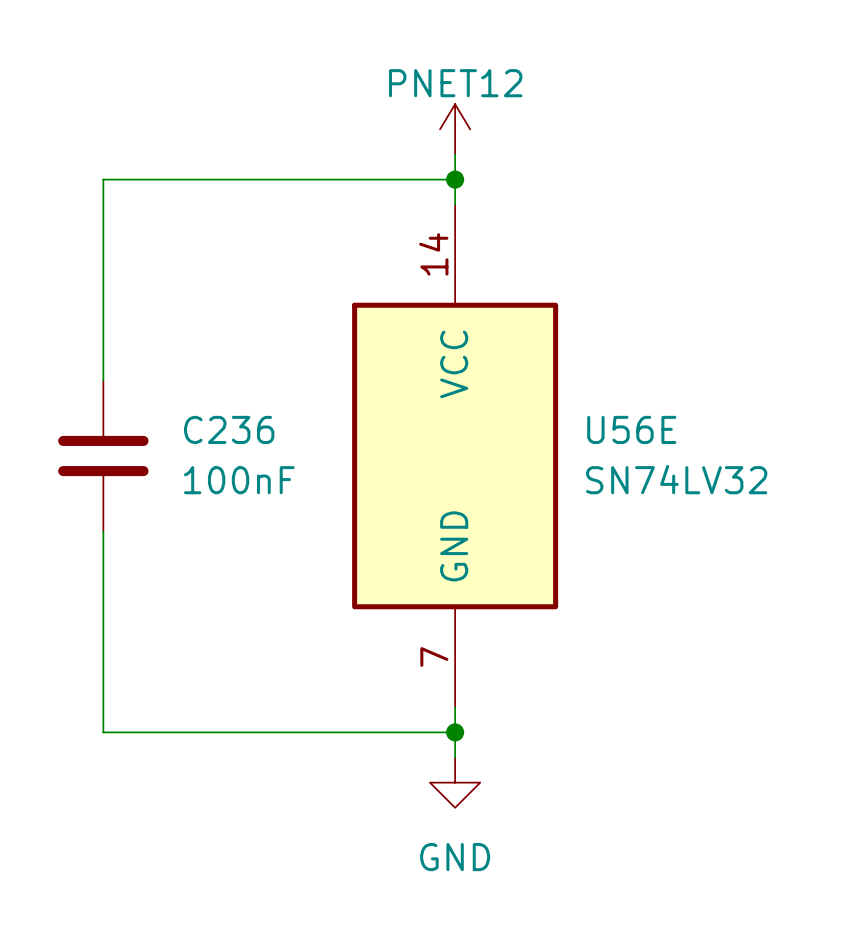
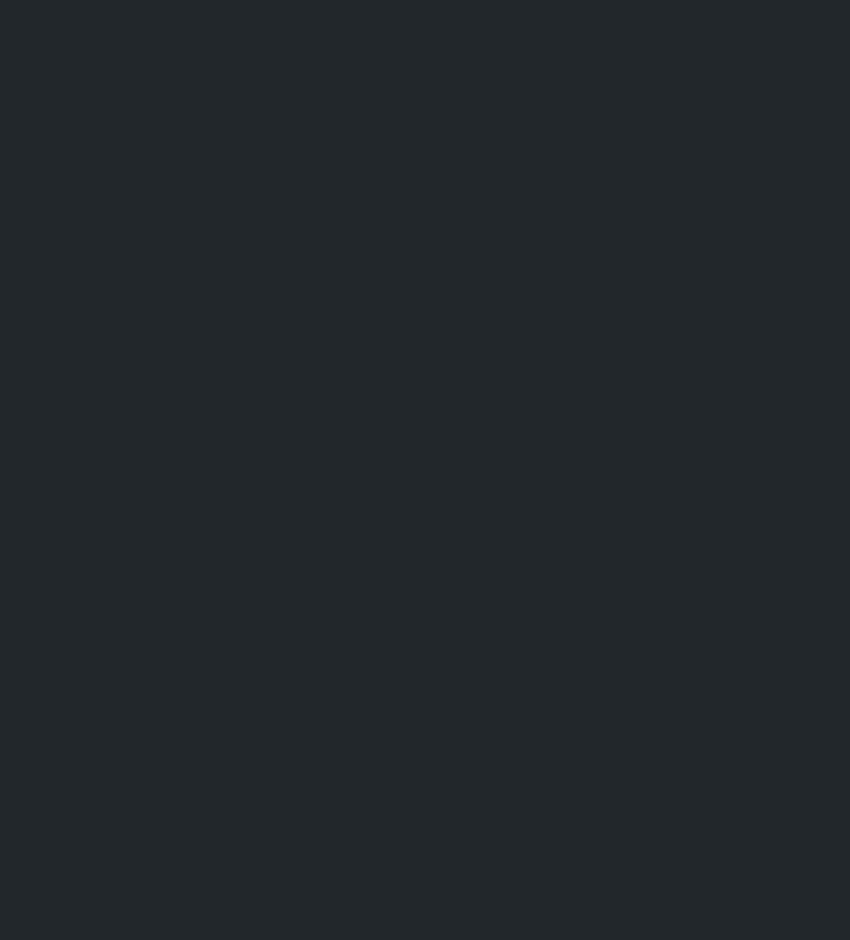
power symbol: PNET12 (455, 129) -> none
wire: (455, 154) (455, 204) -> none
wire: (455, 179) (103, 179) (103, 380) -> none
junction: (455, 179) -> none
C236: 100nF (103, 456) -> none
U56E: SN74LV32 (455, 456) -> none
wire: (103, 531) (103, 732) (455, 732) -> none
wire: (455, 707) (455, 757) -> none
junction: (455, 732) -> none
power symbol: GND (455, 782) -> none

